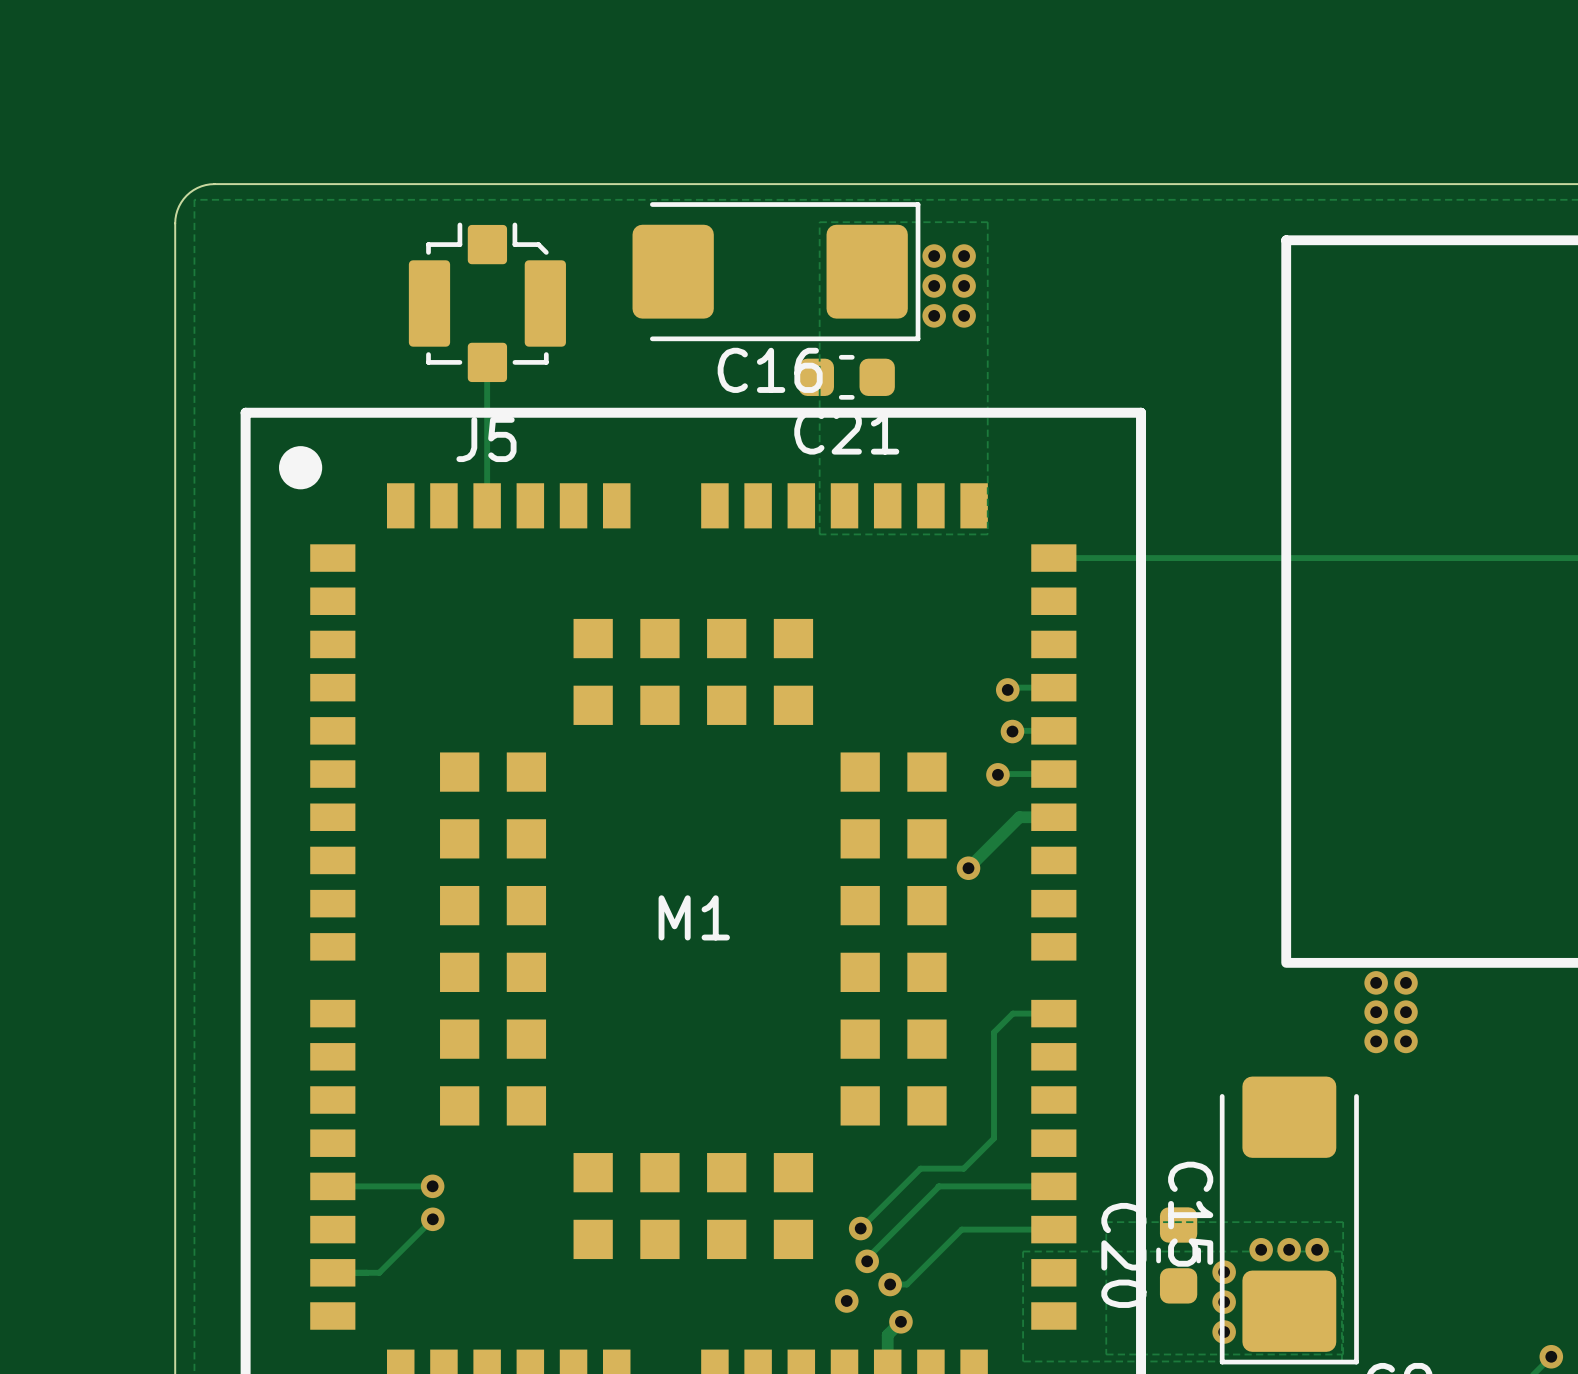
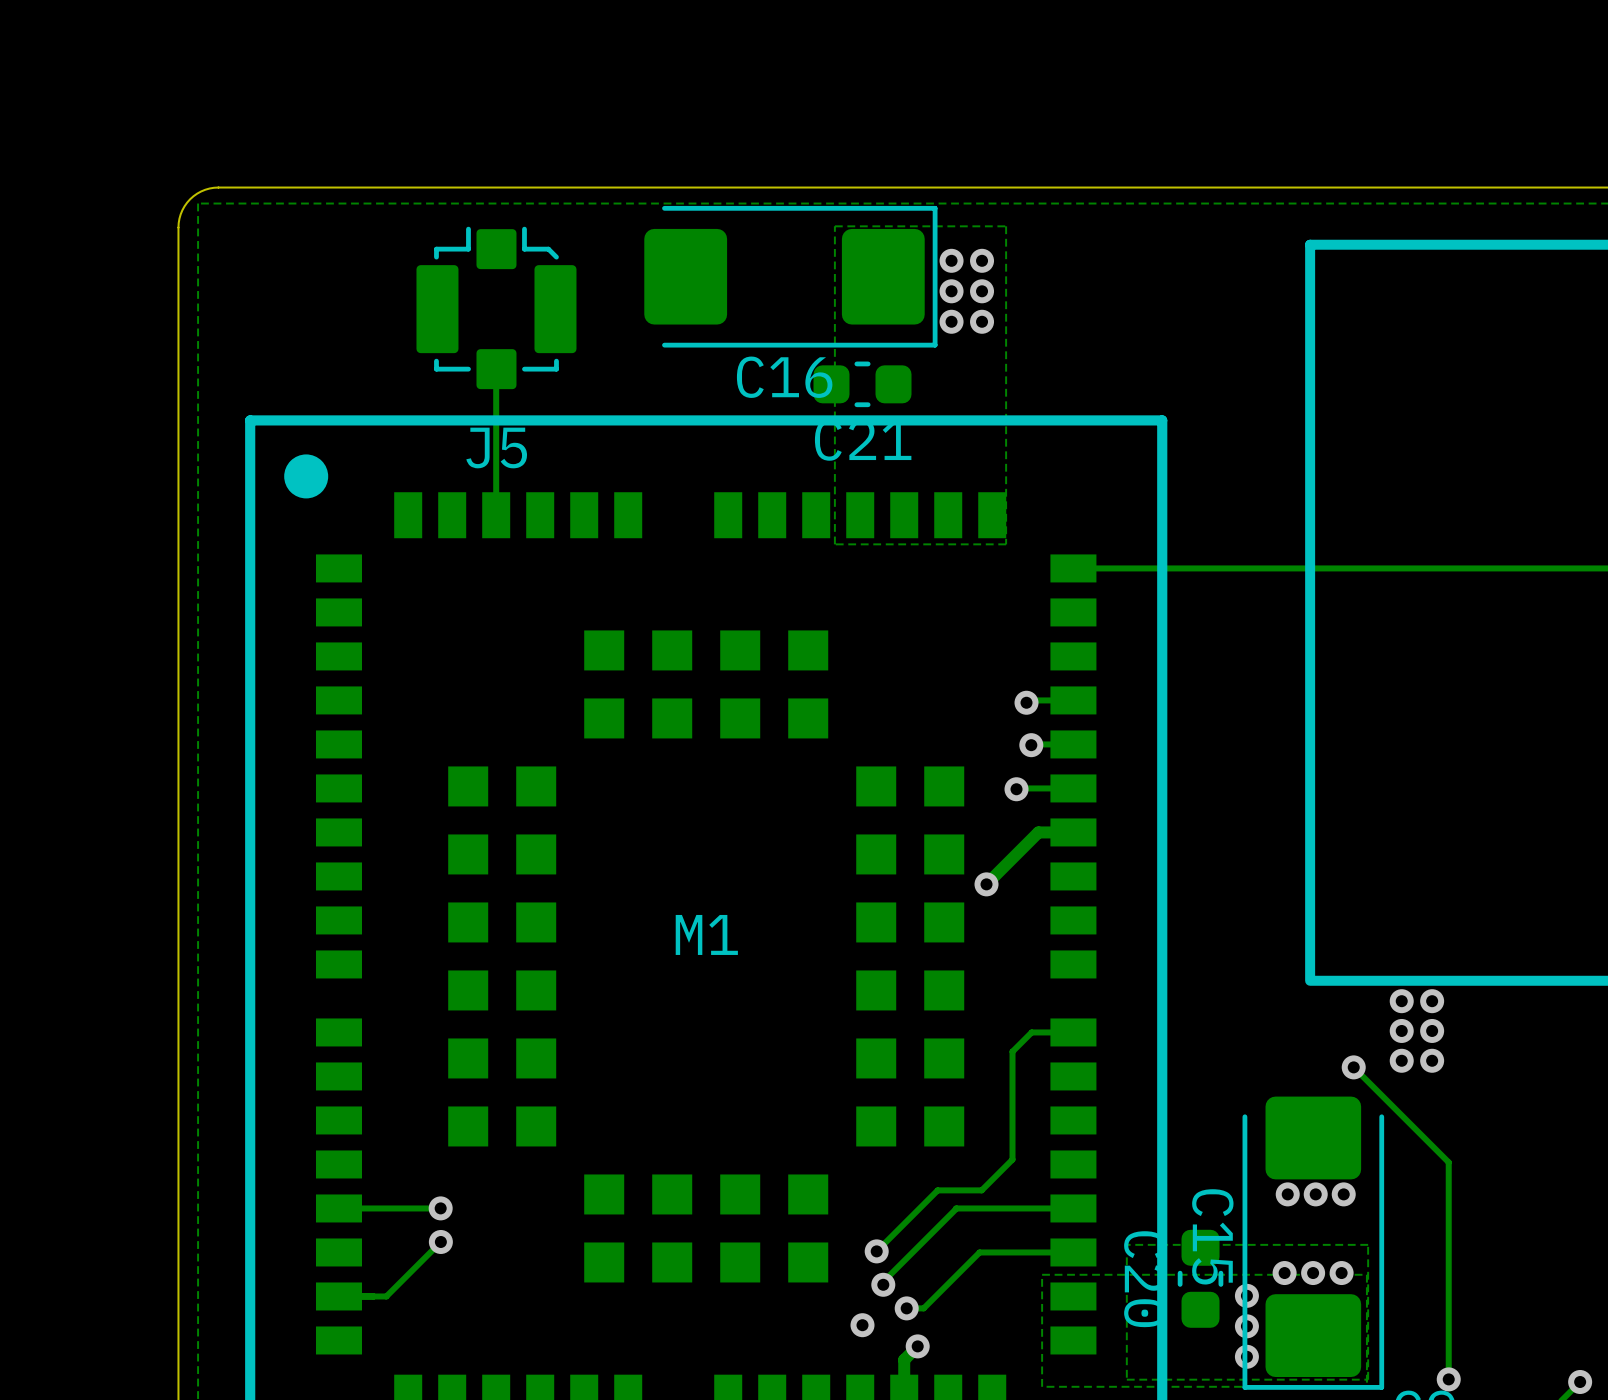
track: none -> (1353, 1067) (1448, 1162) (1448, 1379)
via: none -> (1353, 1067)
via: none -> (1287, 1194)
via: none -> (1315, 1194)
via: none -> (1343, 1194)
via: none -> (1448, 1379)

